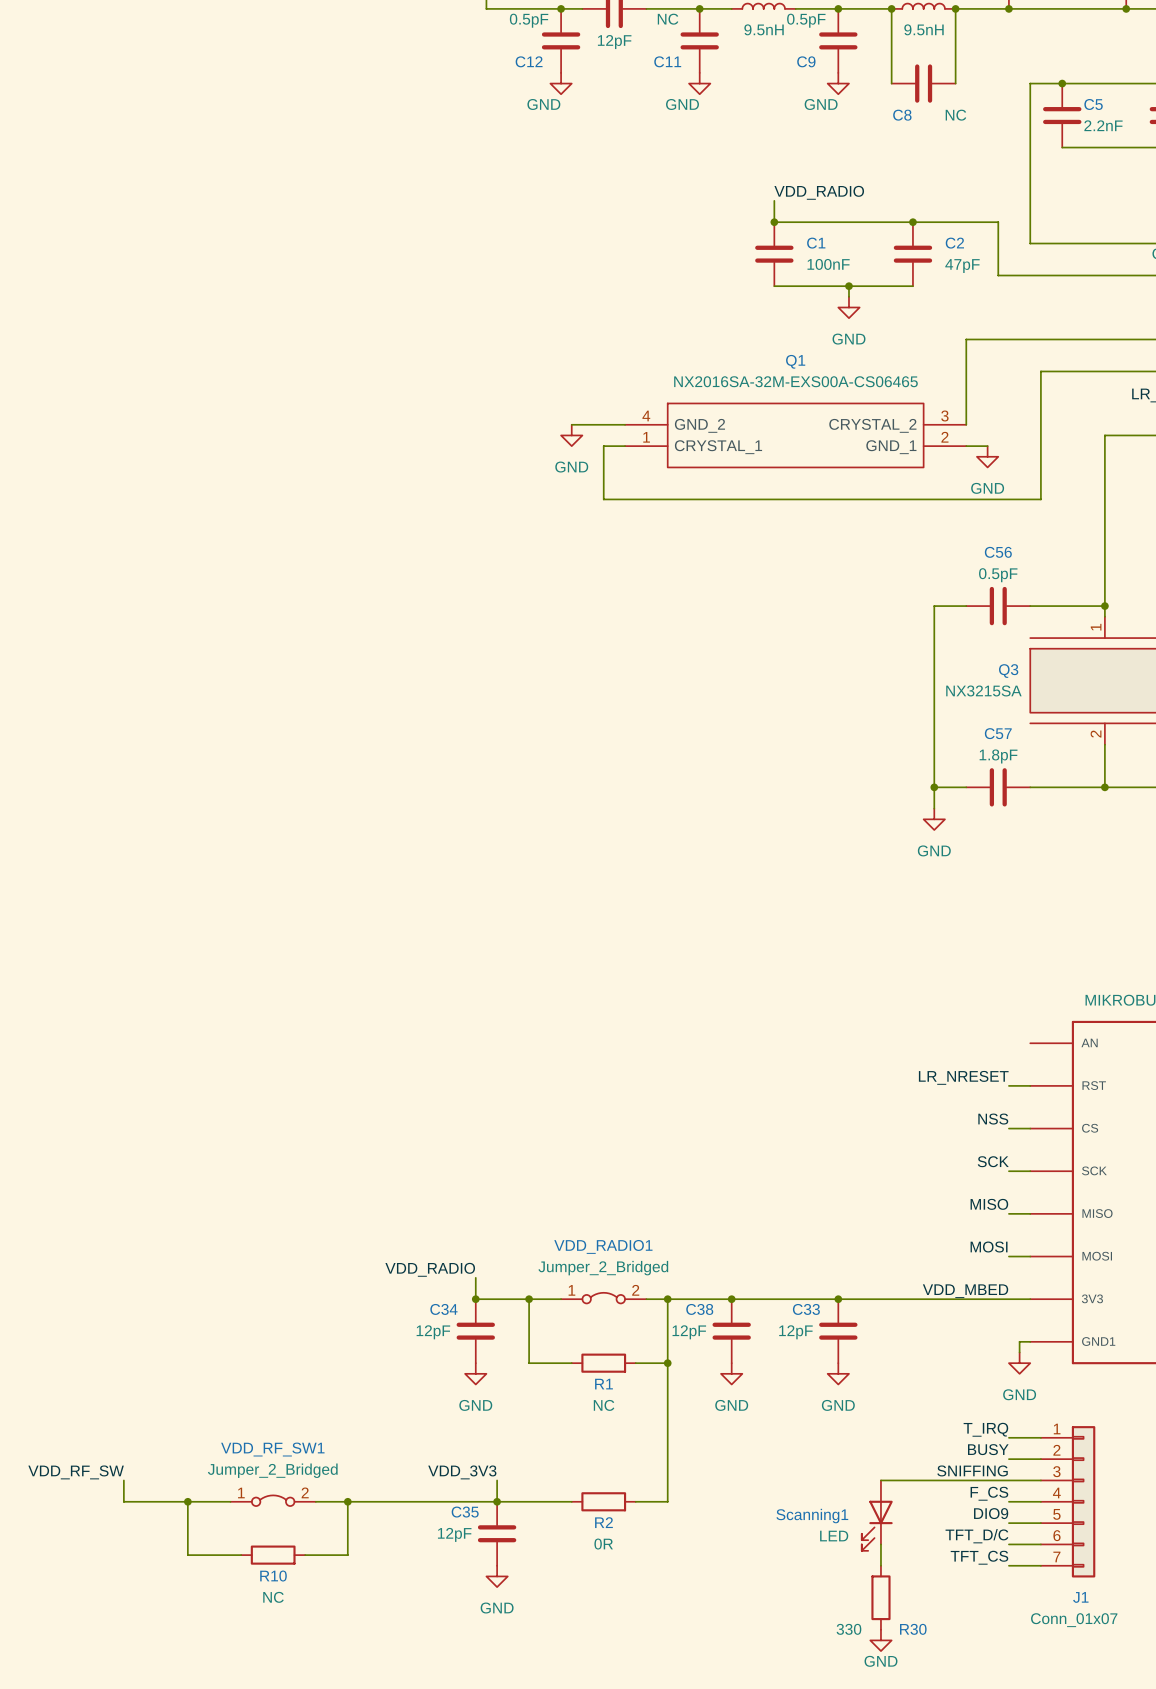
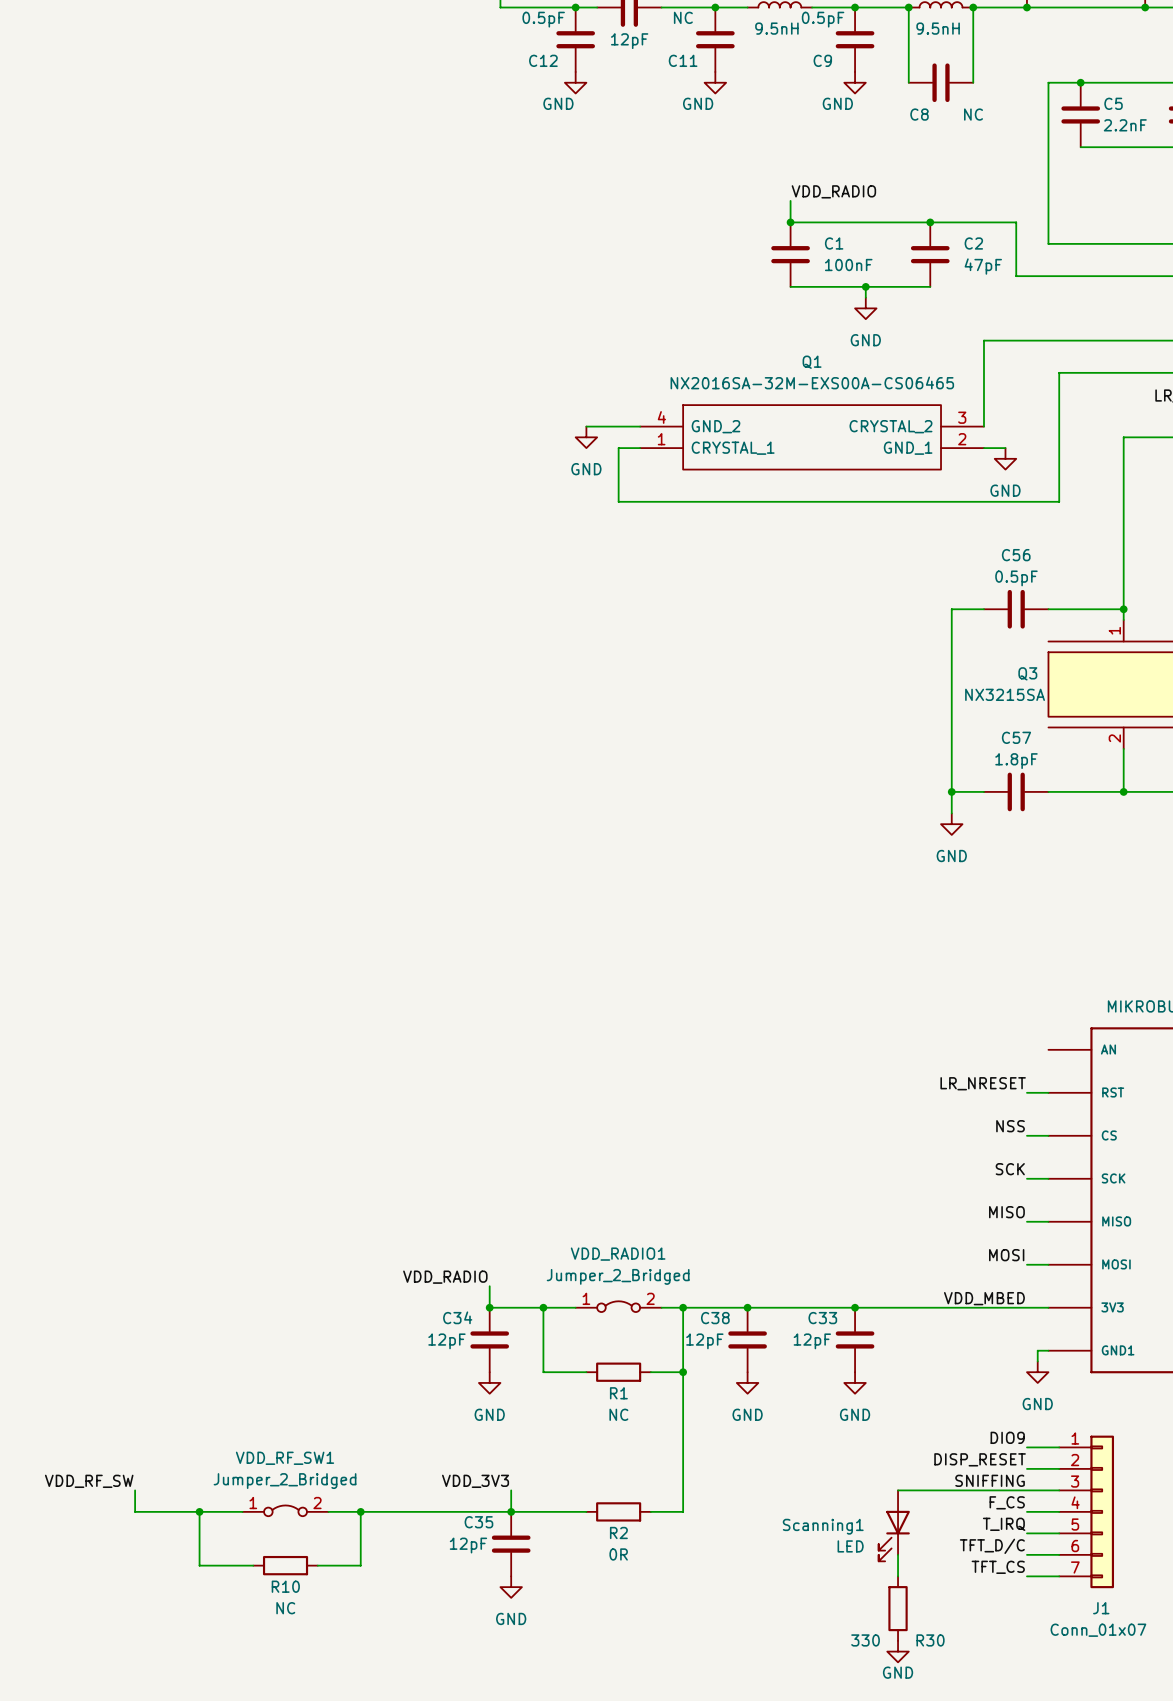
label: T_IRQ (985, 1429) -> DIO9 (1007, 1437)
label: BUSY (988, 1449) -> DISP_RESET (980, 1459)
label: DIO9 (991, 1513) -> T_IRQ (1004, 1524)

